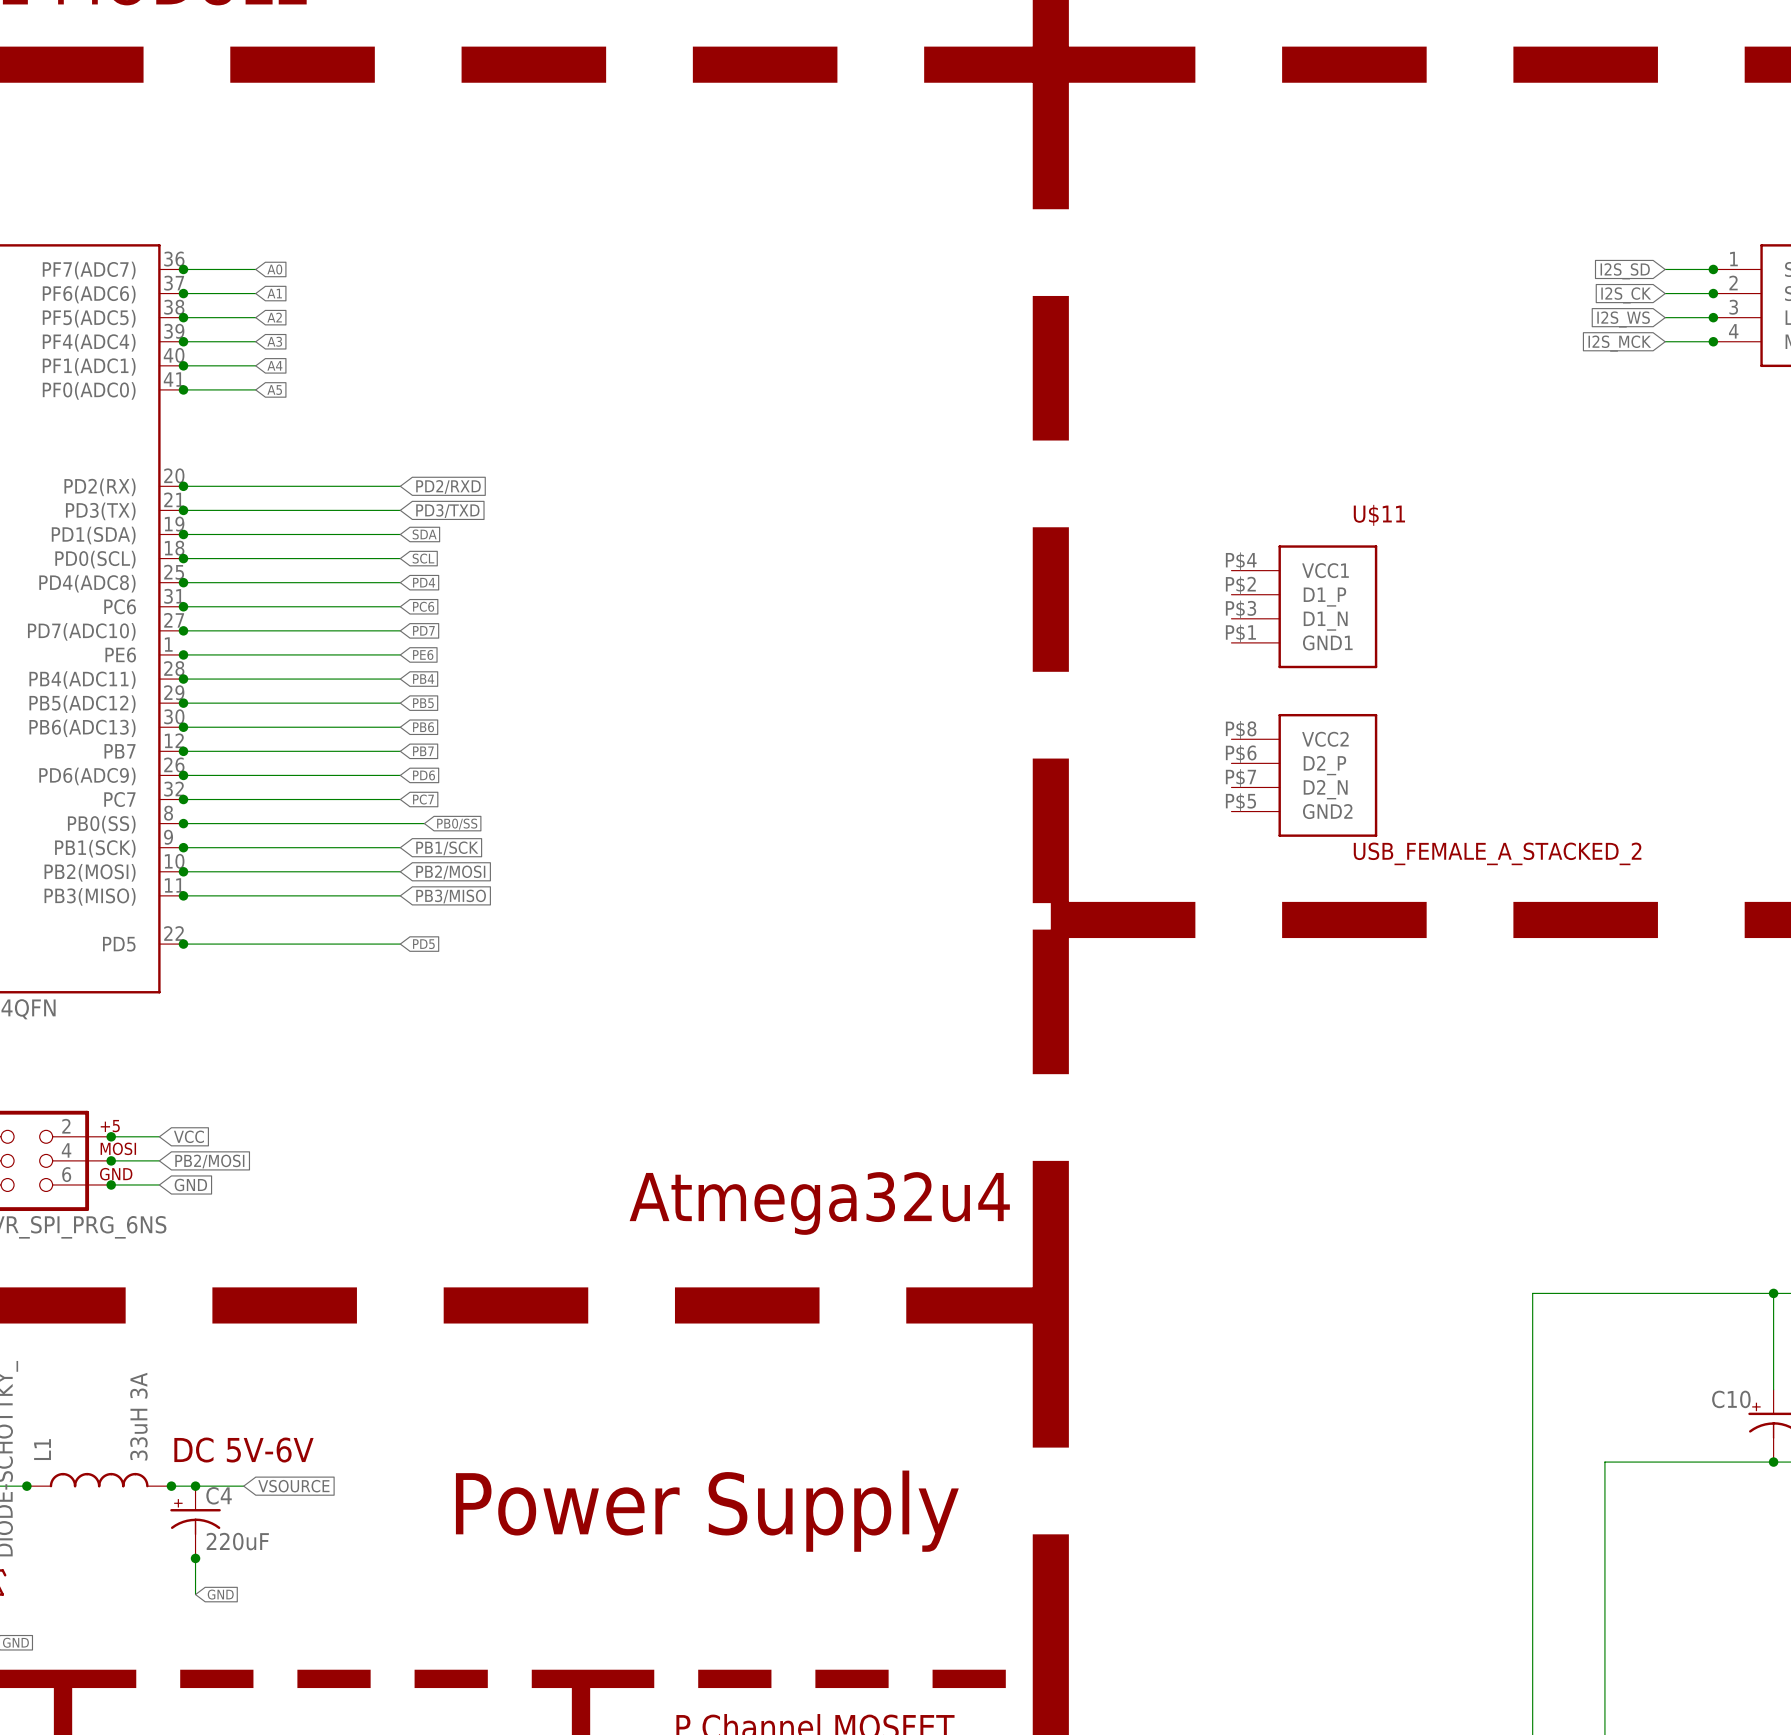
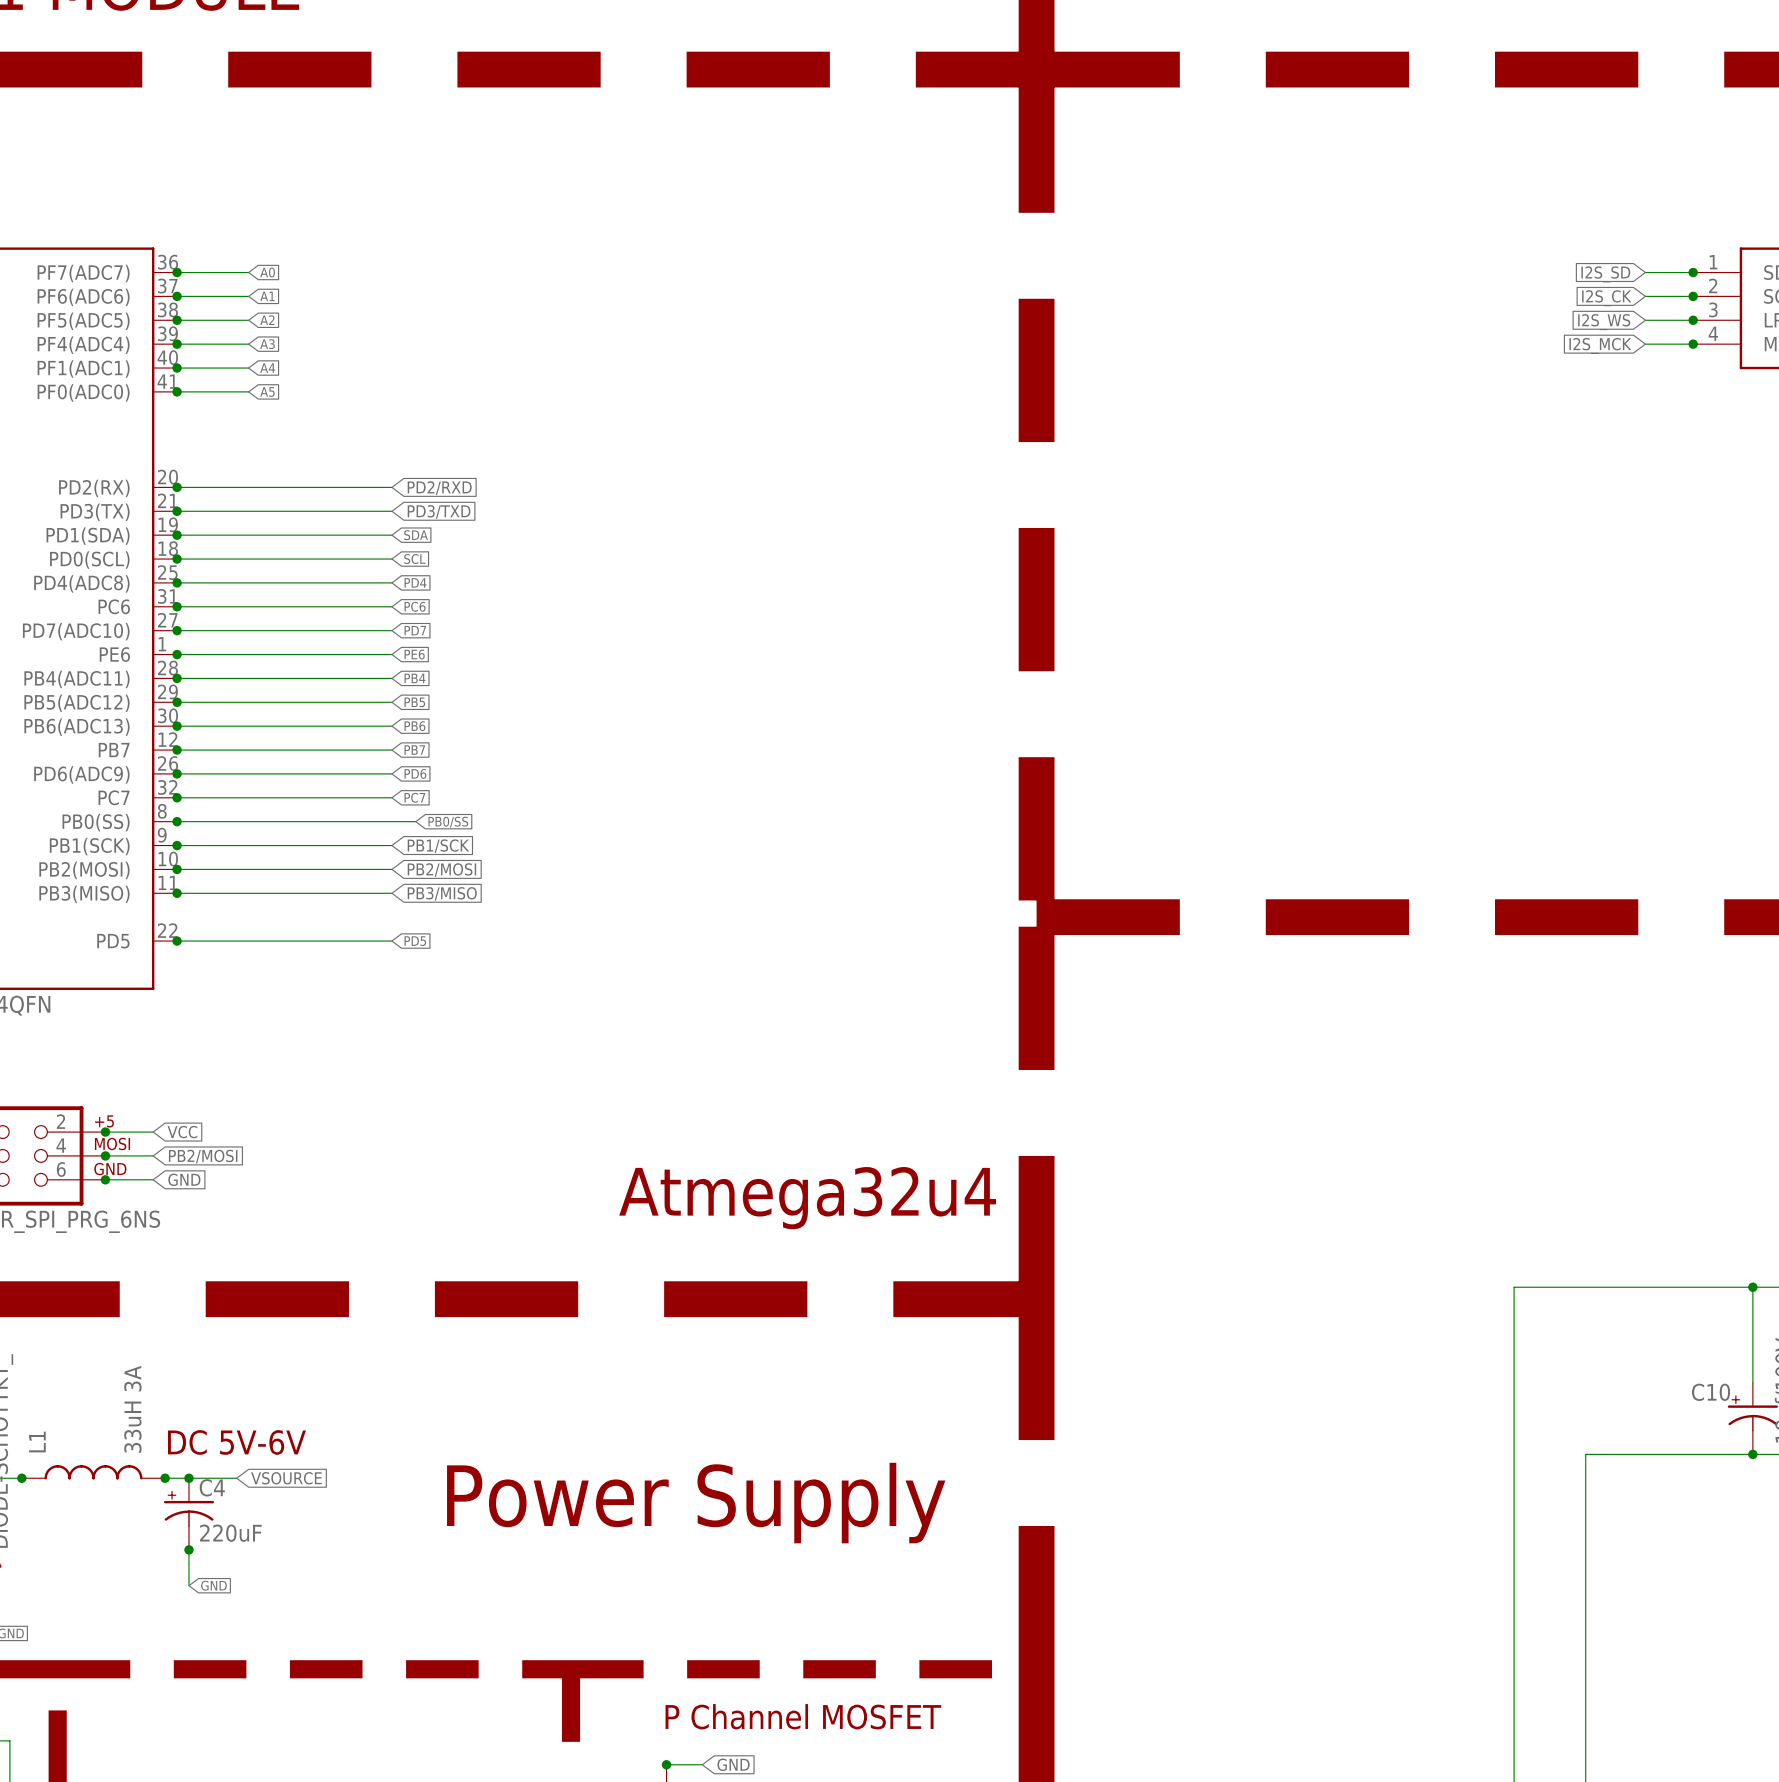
U$11: USB_FEMALE_A_STACKED_2 (1304, 691) -> none

